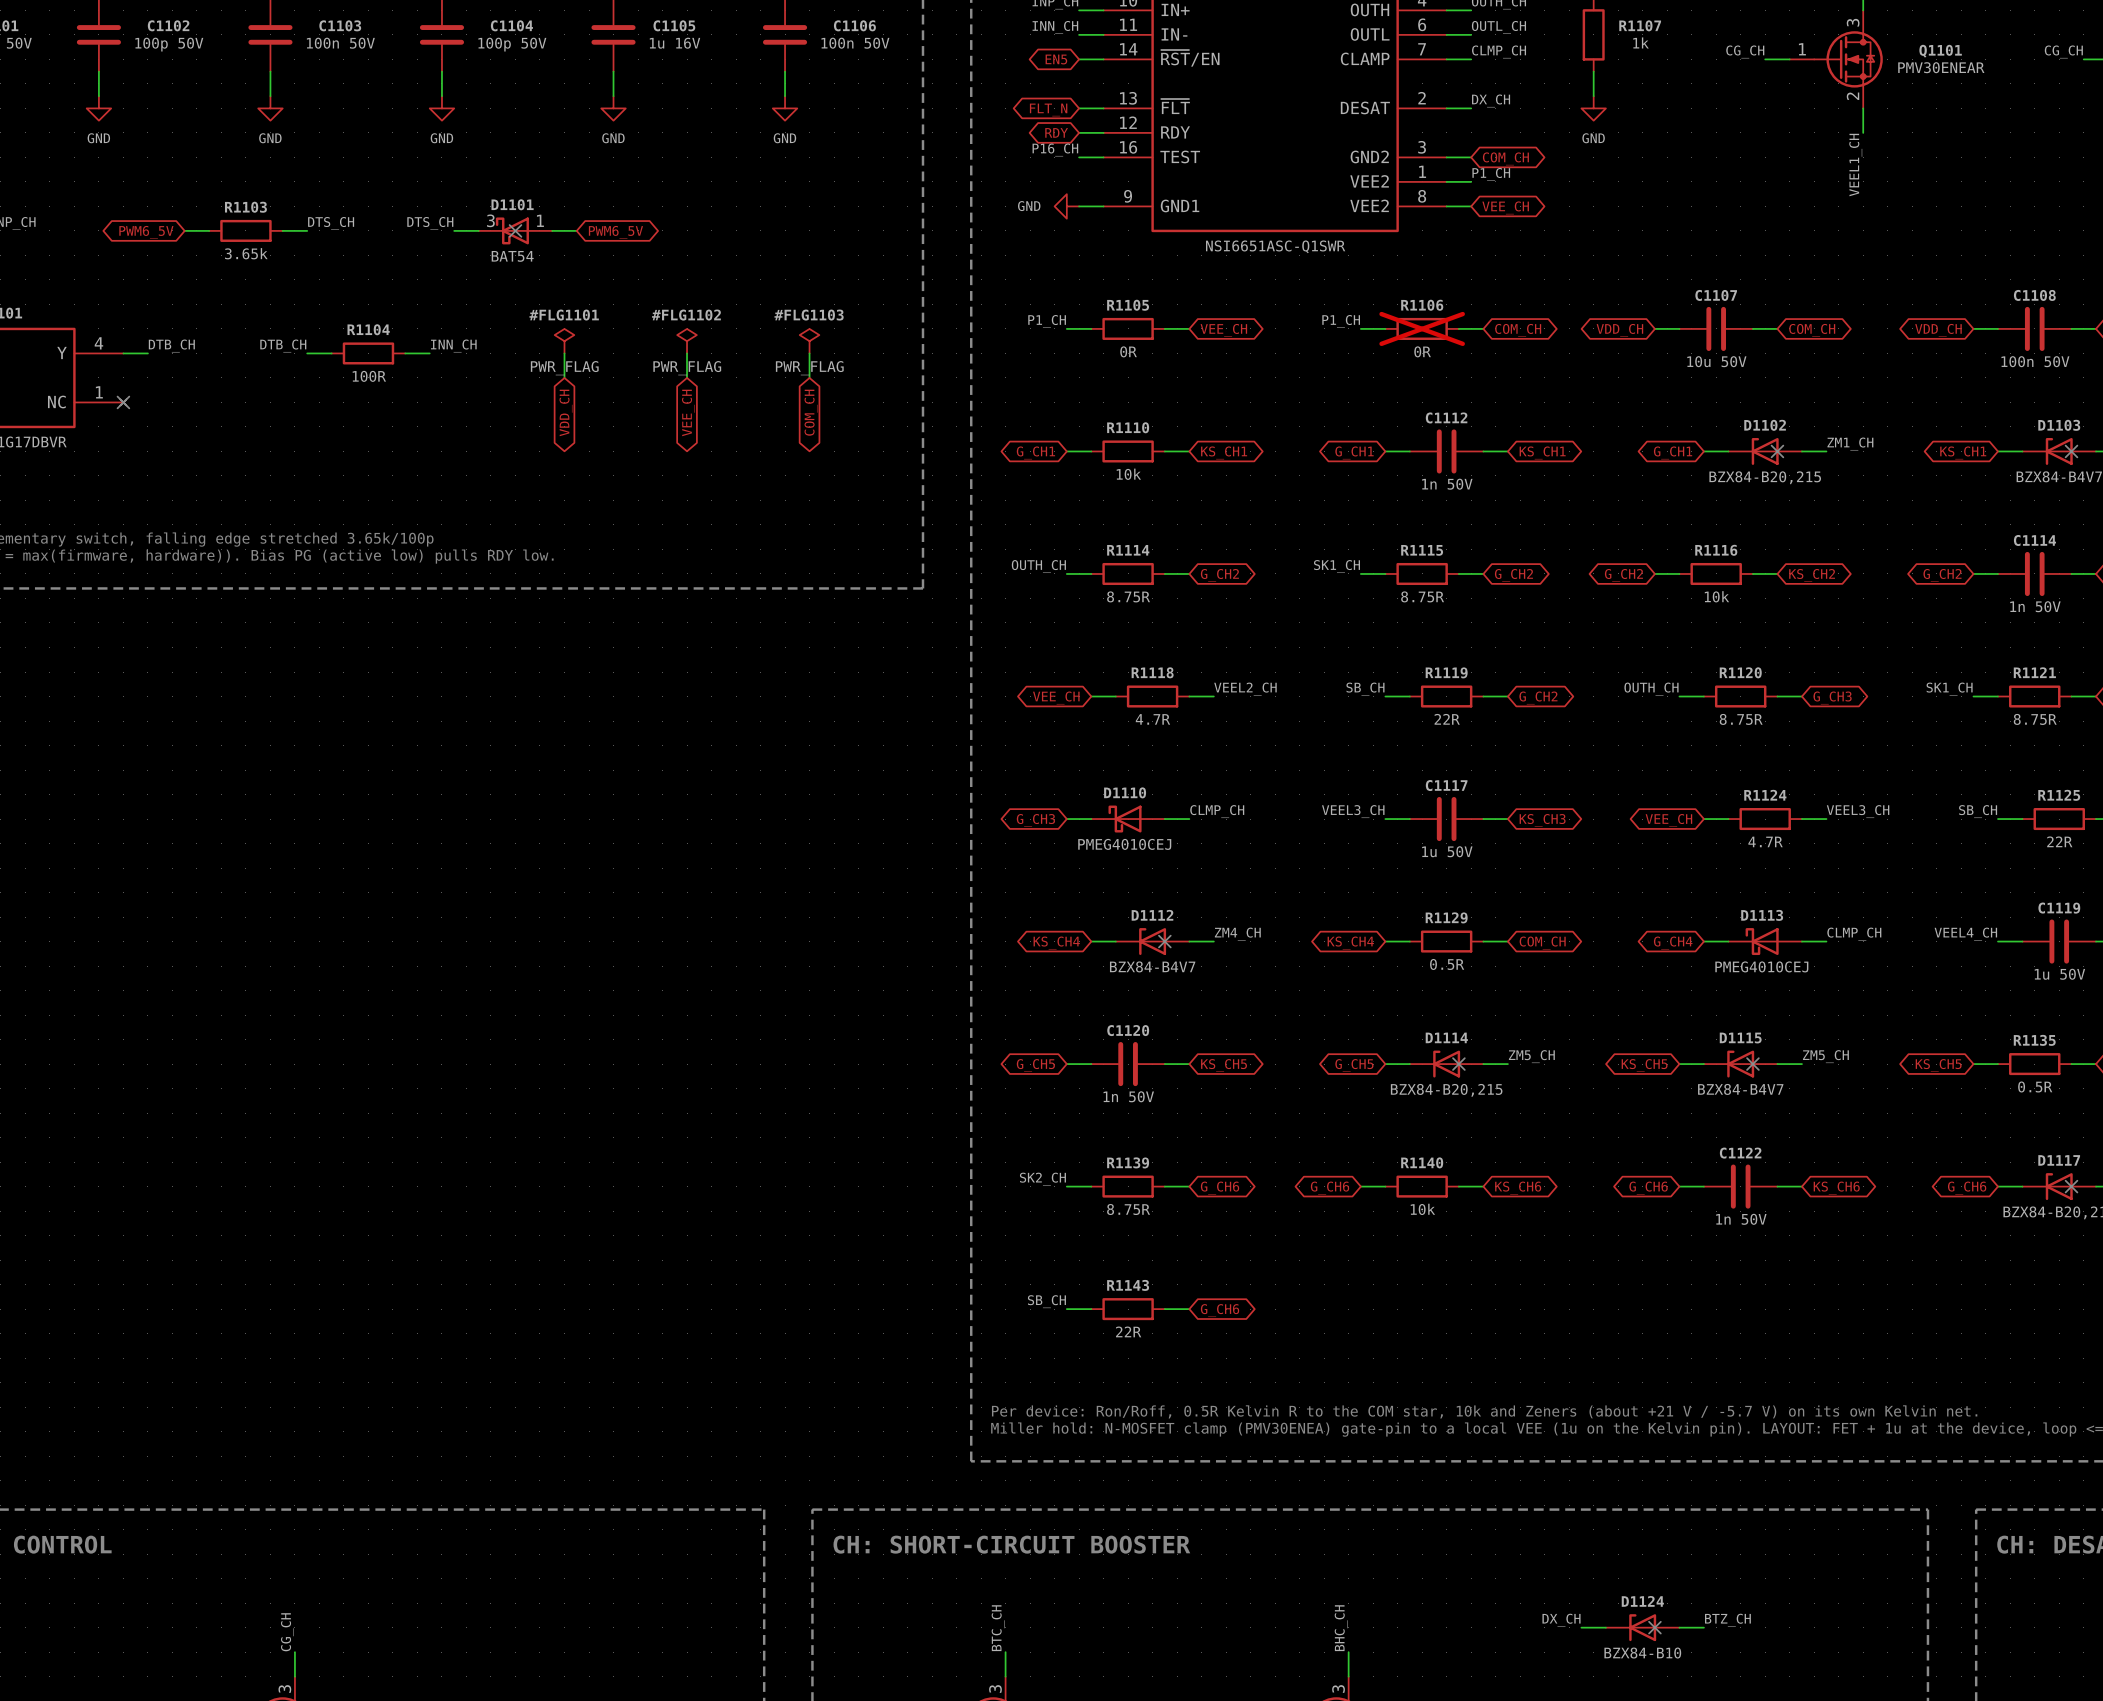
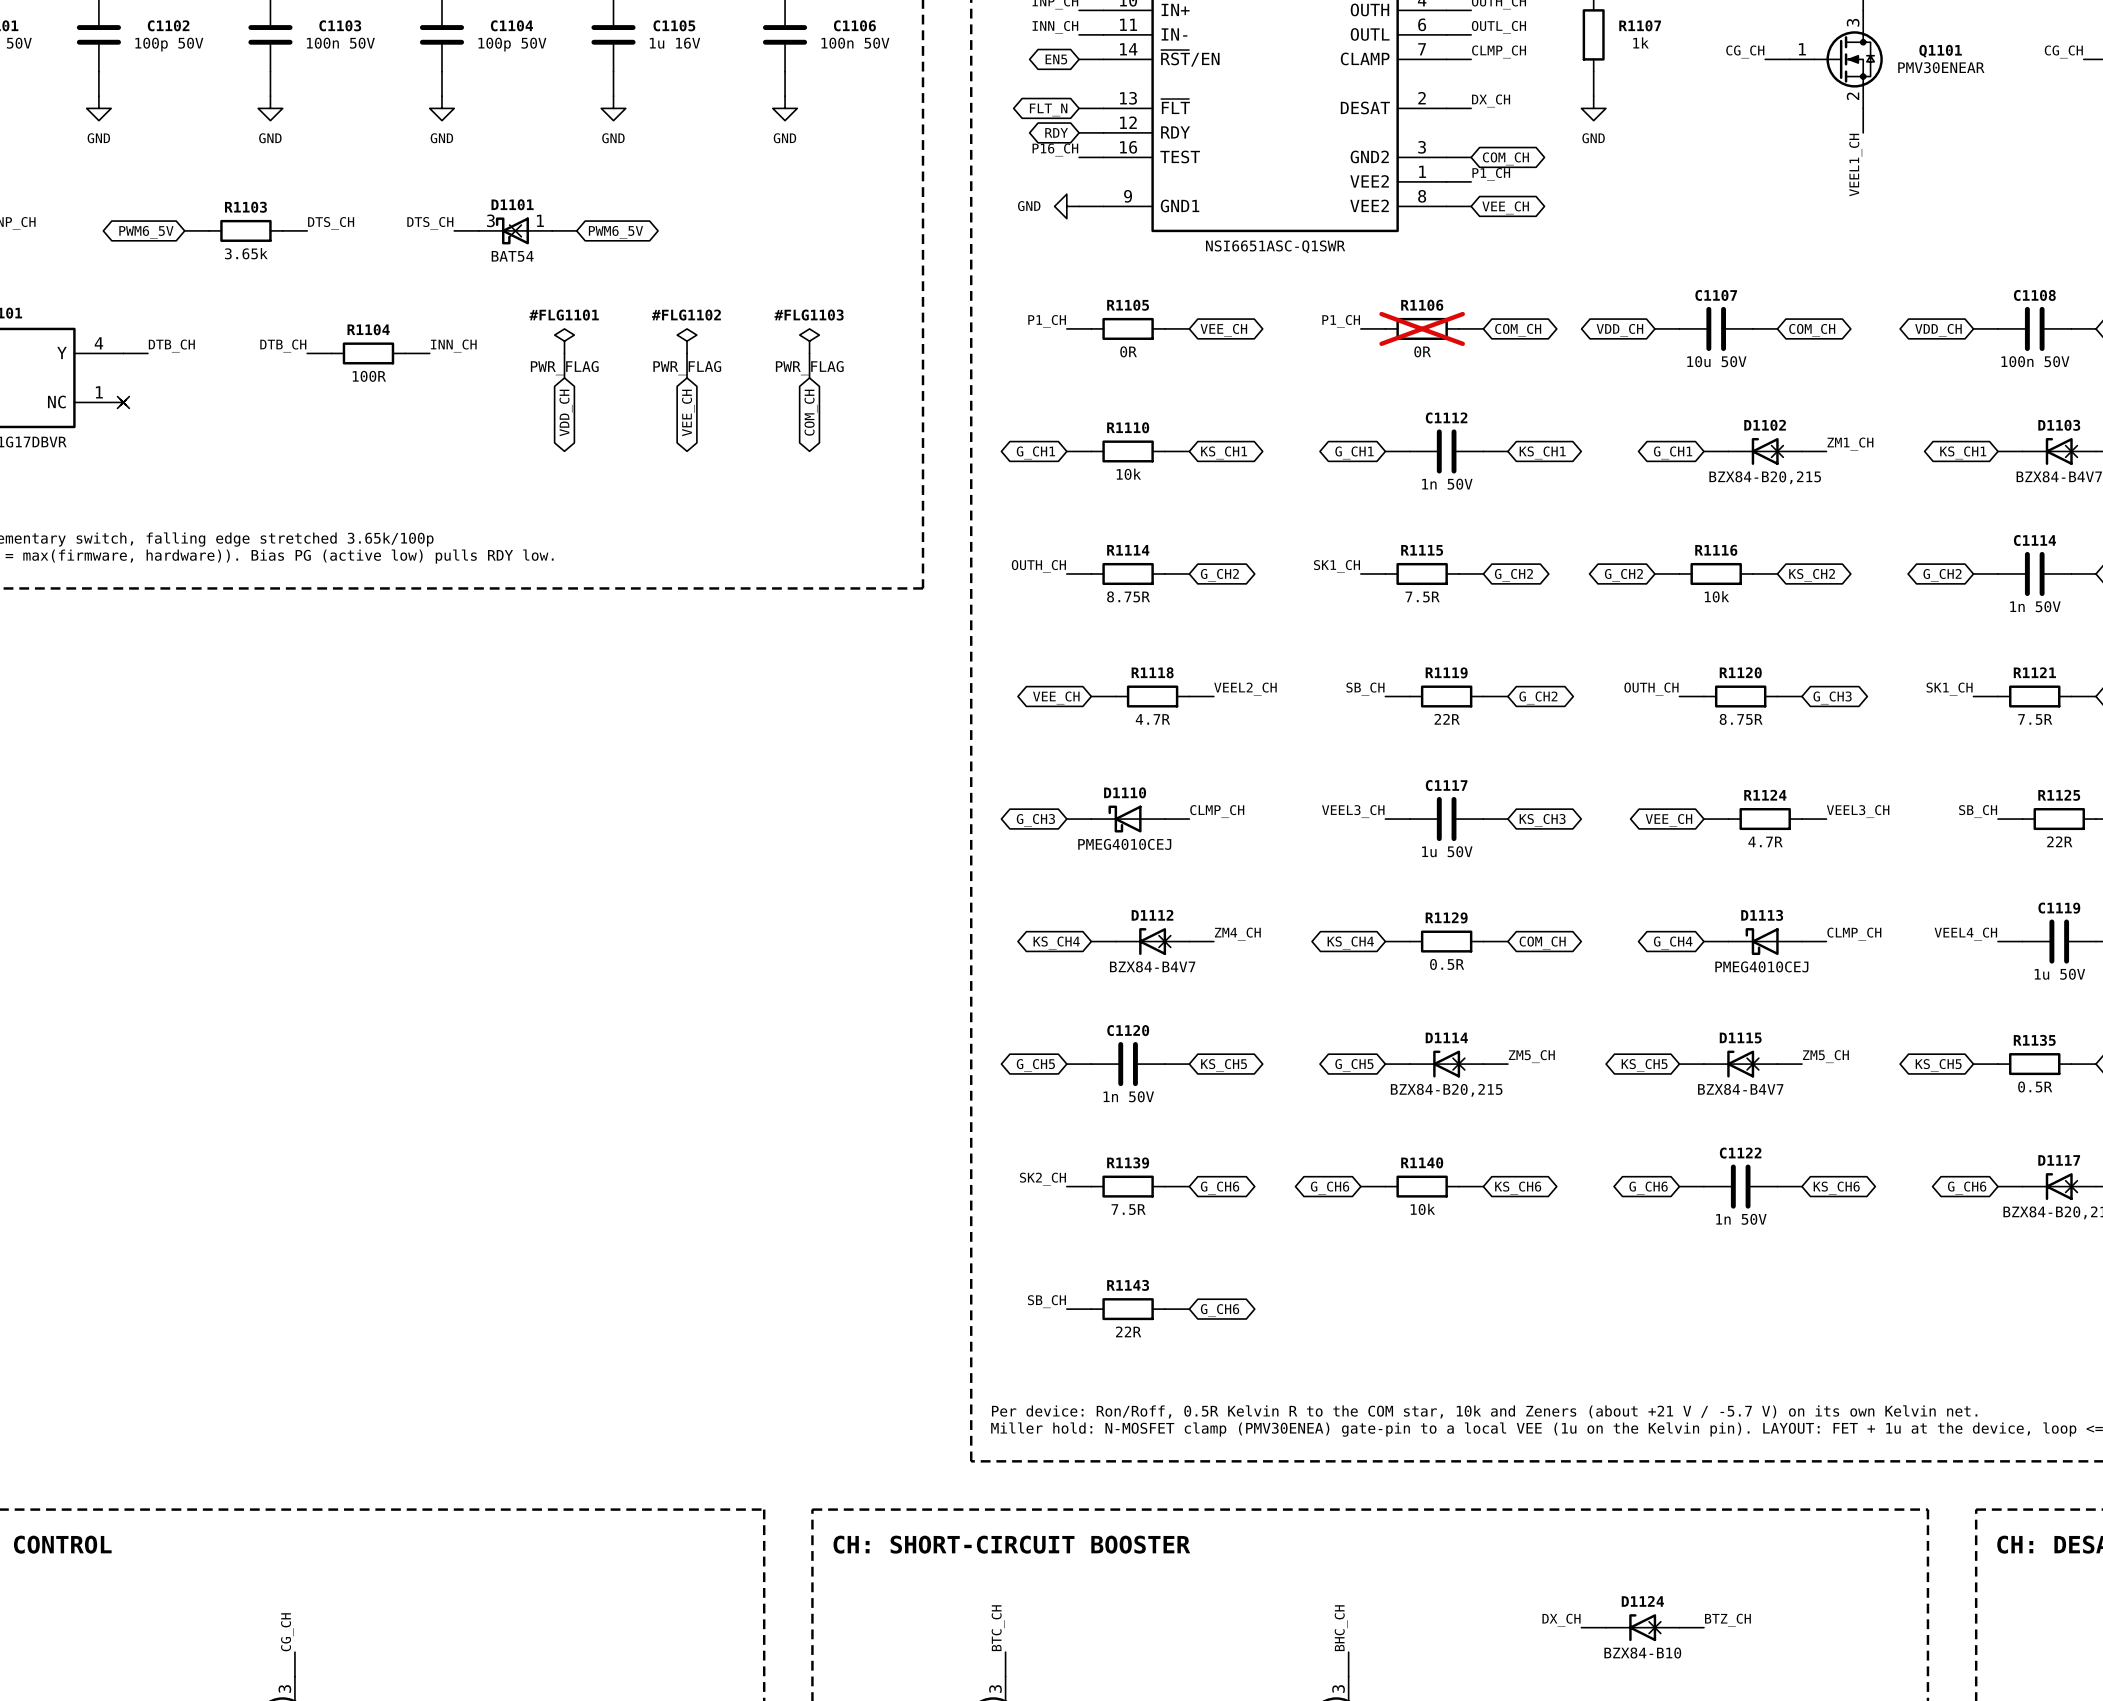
R1115 value: 8.75R (1422, 596) -> 7.5R (1422, 597)
R1121 value: 8.75R (2035, 719) -> 7.5R (2035, 719)
R1139 value: 8.75R (1128, 1209) -> 7.5R (1128, 1209)

